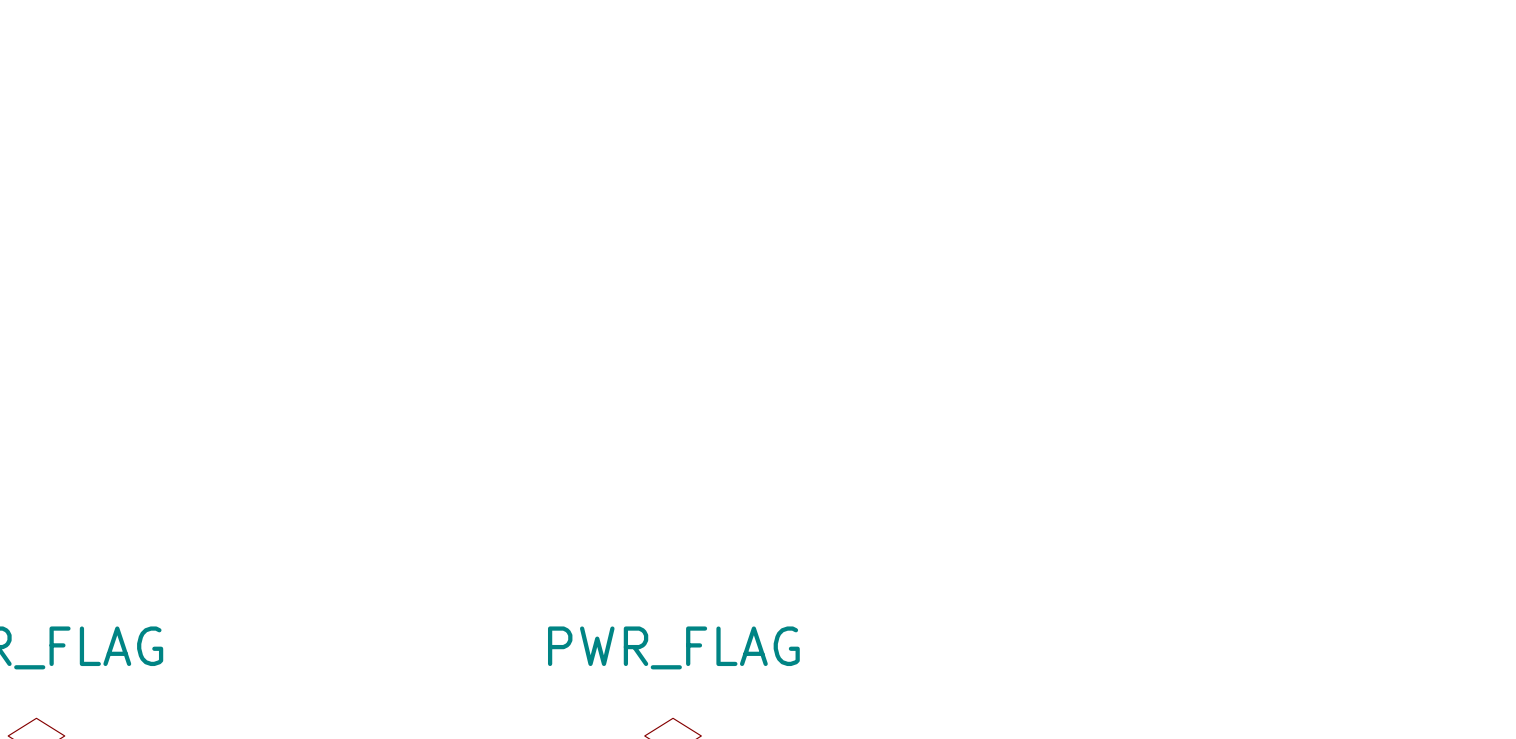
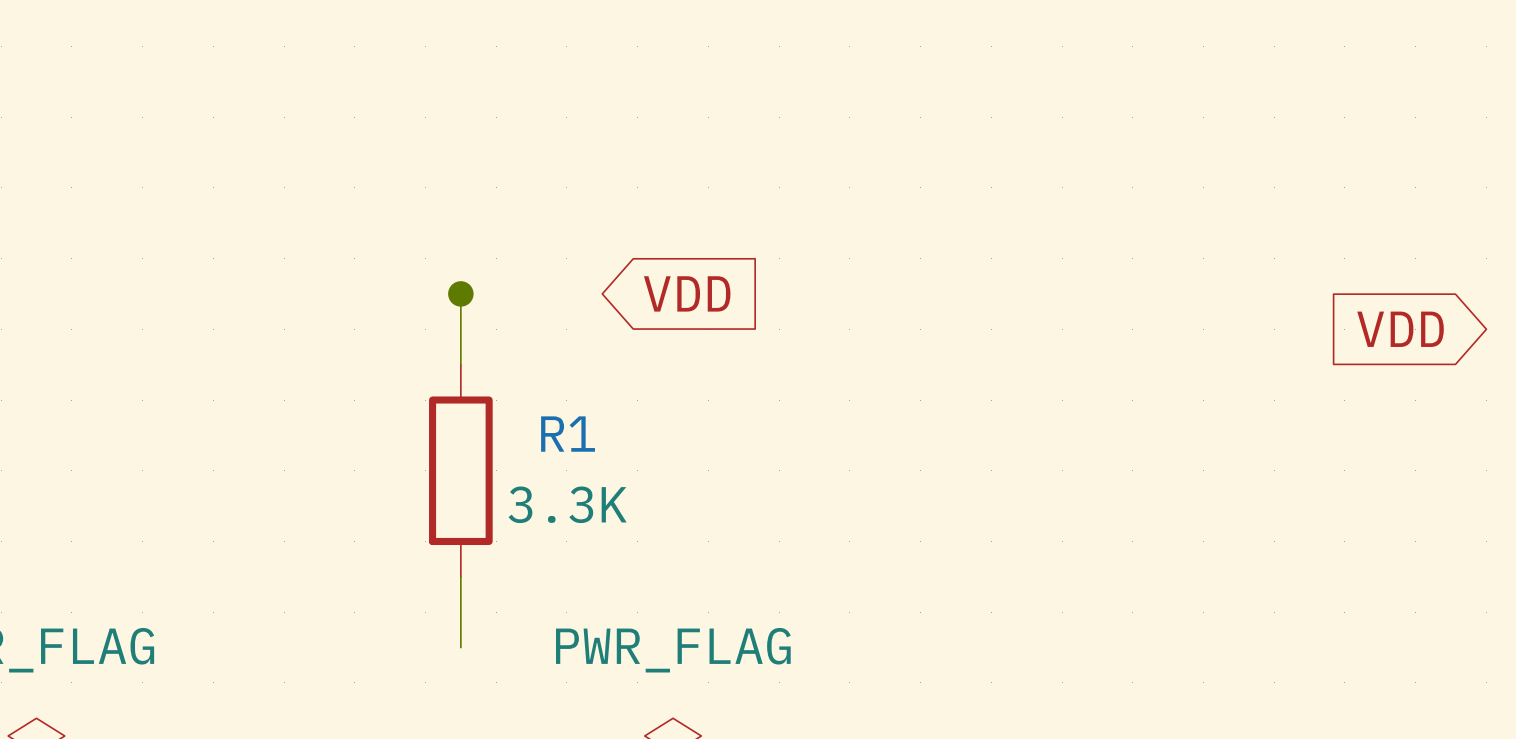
wire: none -> (460, 293) (460, 364)
junction: none -> (460, 293)
global label: none -> VDD (687, 293)
global label: none -> VDD (1400, 329)
R1: none -> 3.3K (460, 470)
wire: none -> (460, 576) (460, 647)

